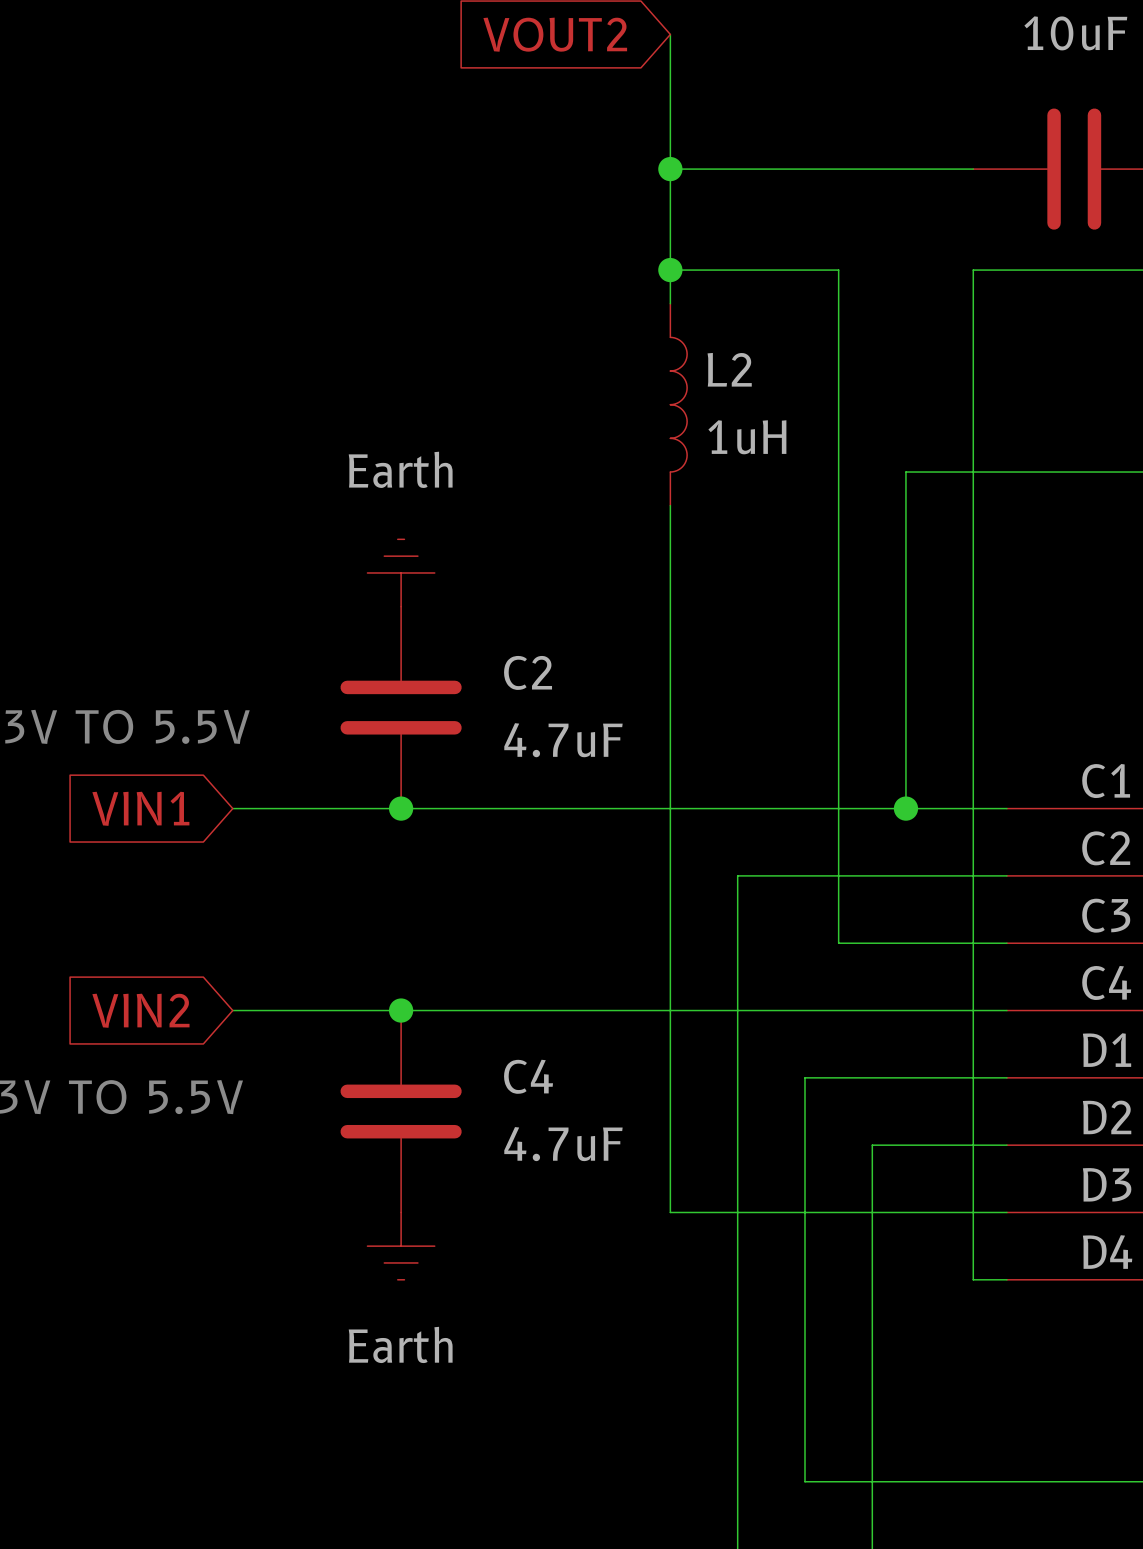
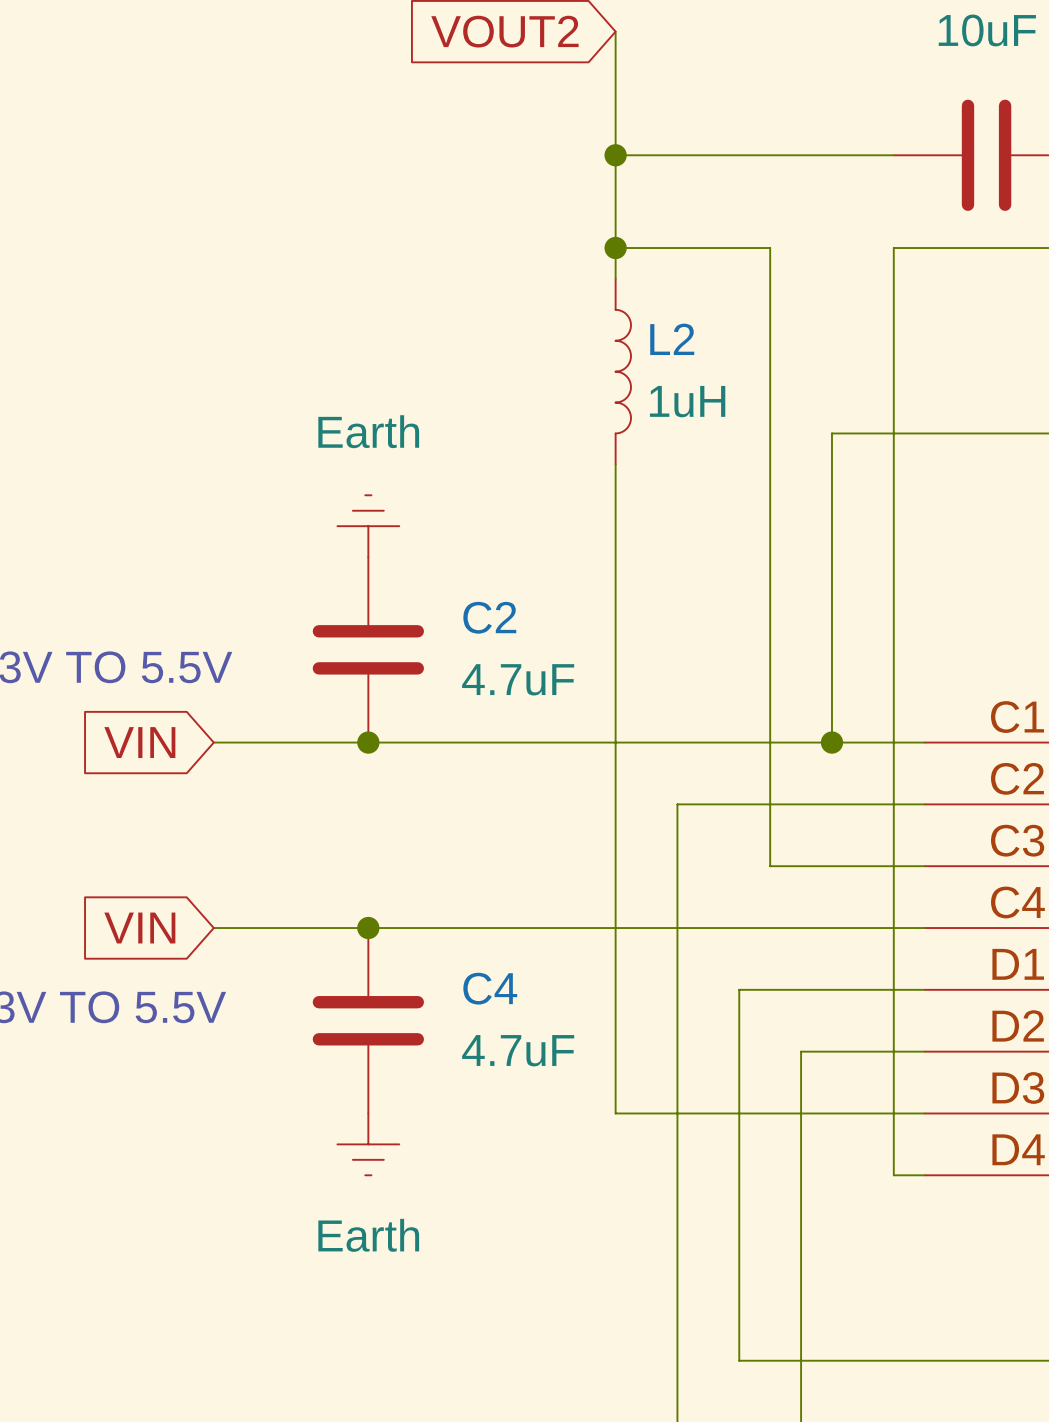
global label: VIN1 (140, 808) -> VIN (139, 742)
global label: VIN2 (140, 1010) -> VIN (139, 928)

